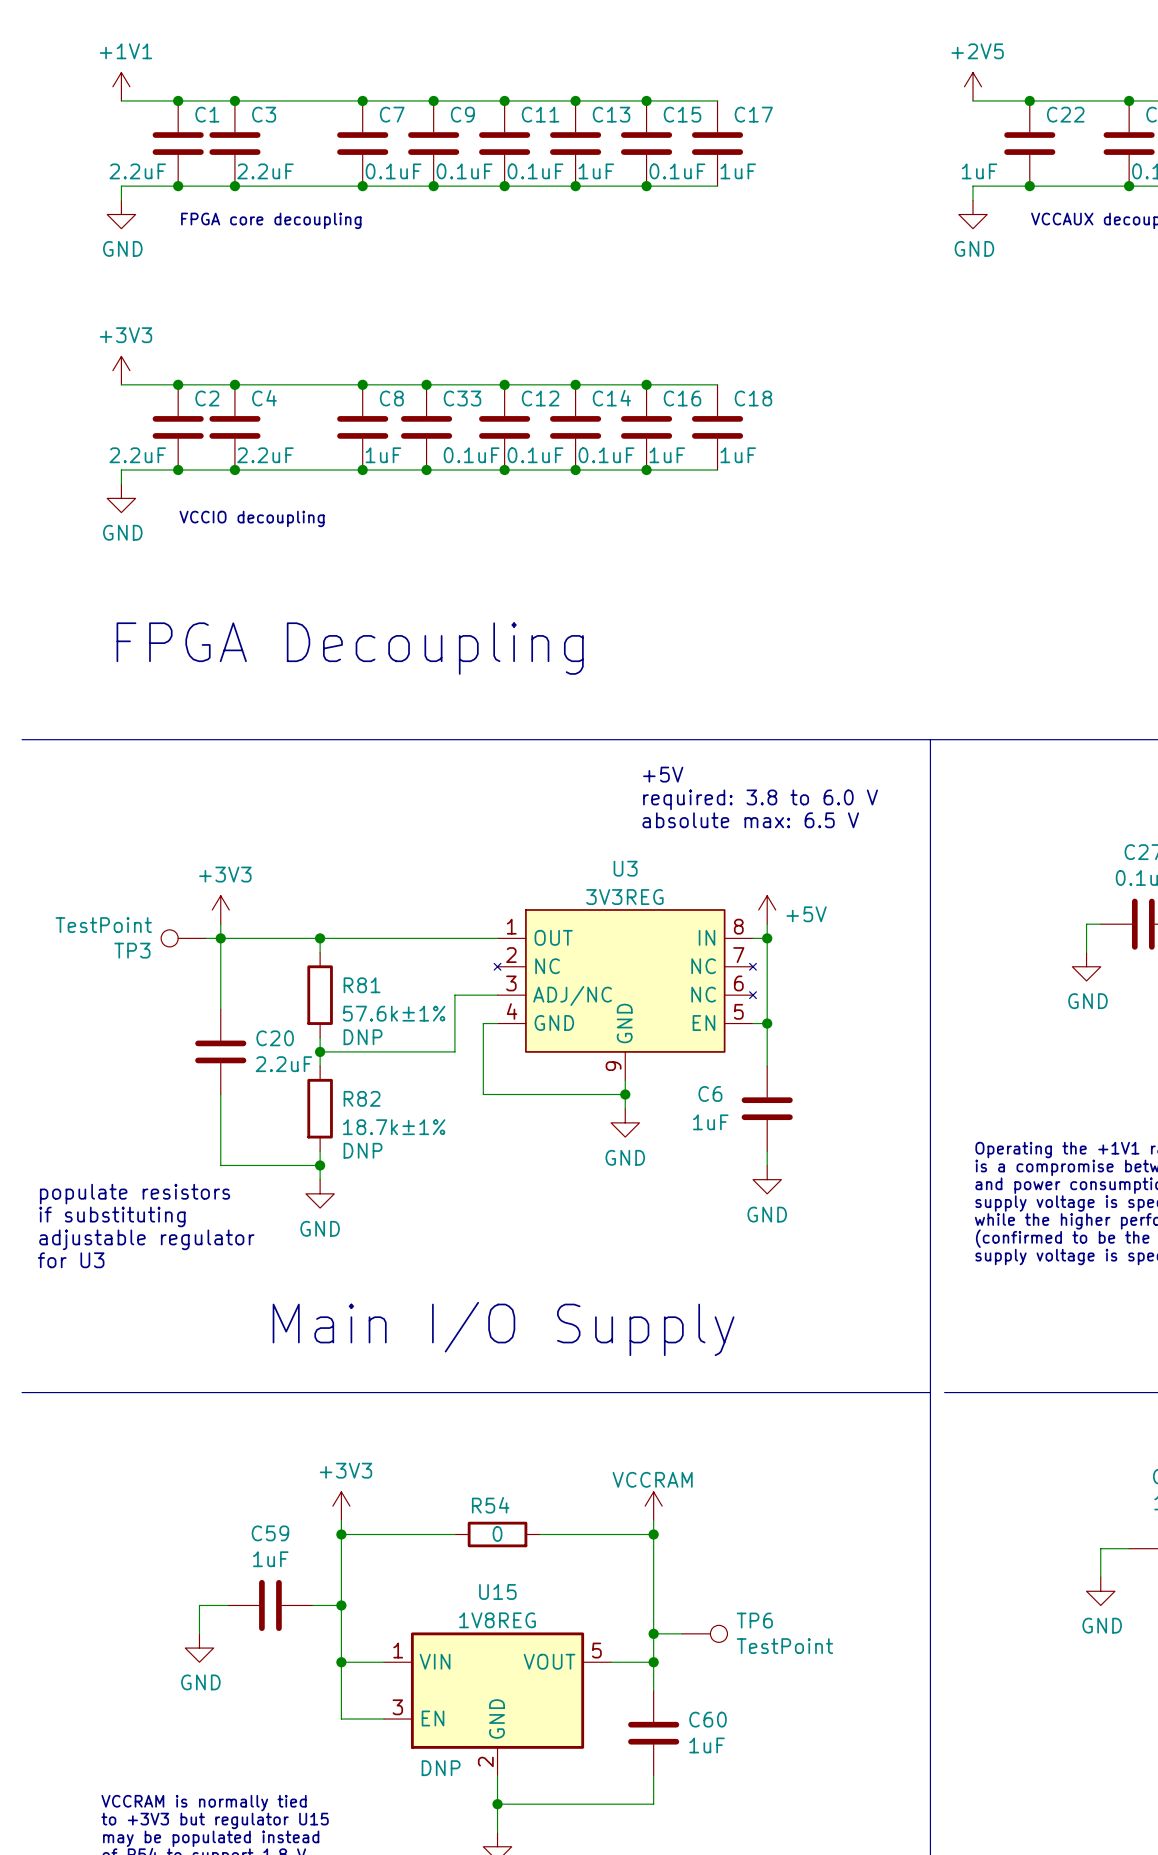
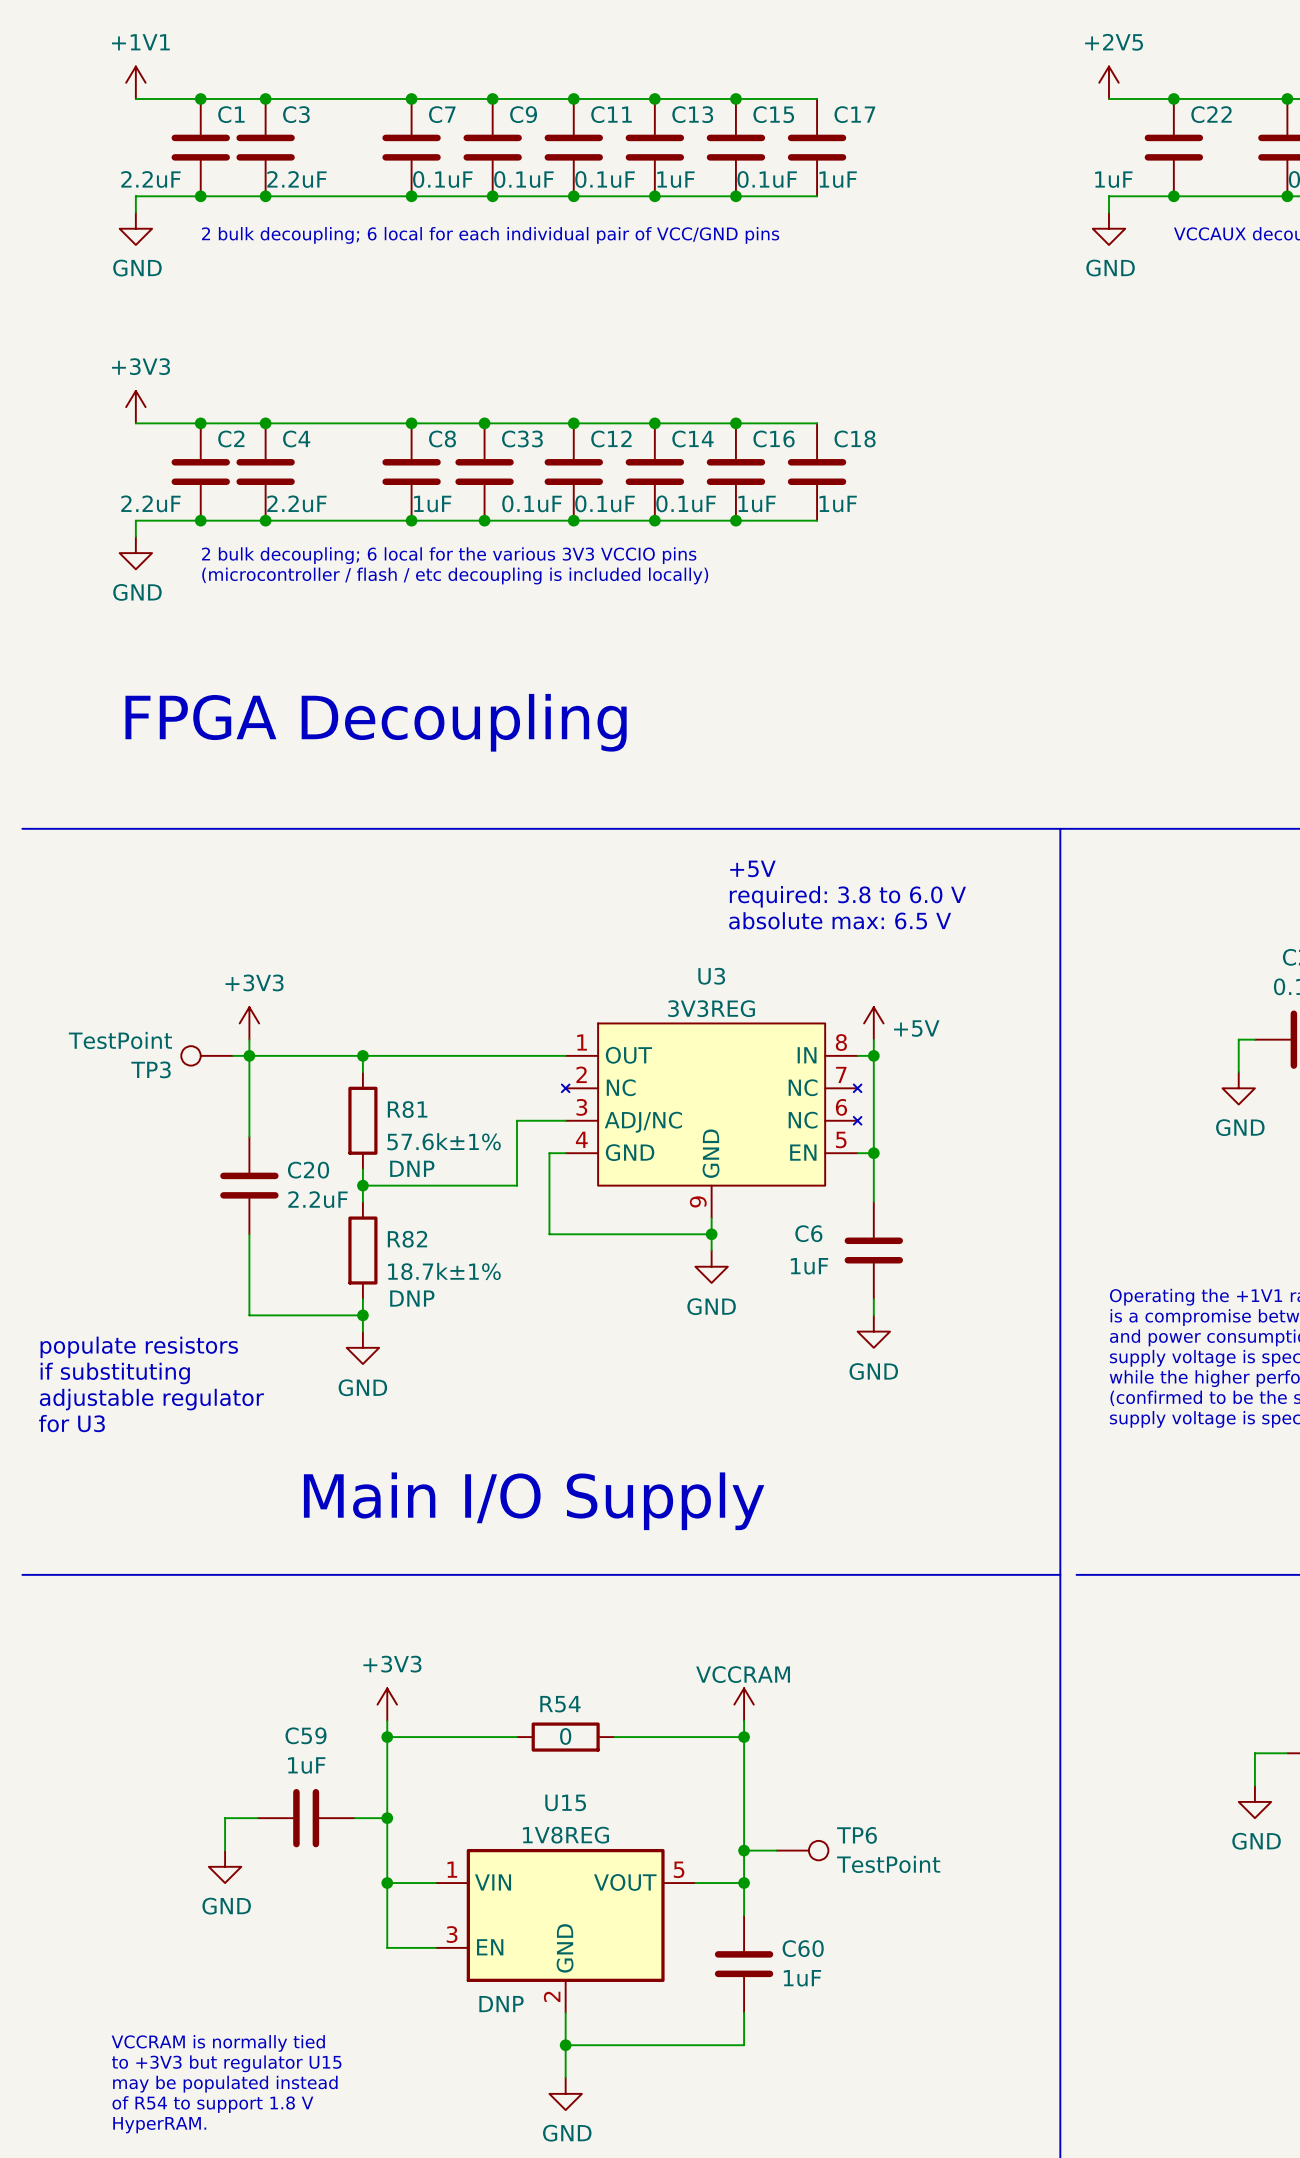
text: FPGA core decoupling (271, 220) -> 2 bulk decoupling; 6 local for each individual pair of VCC/GND pins (490, 235)
text: none -> 2 bulk decoupling; 6 local for the various 3V3 VCCIO pins (449, 555)
text: VCCIO decoupling (252, 518) -> (microcontroller / flash / etc decoupling is included locally) (455, 576)

